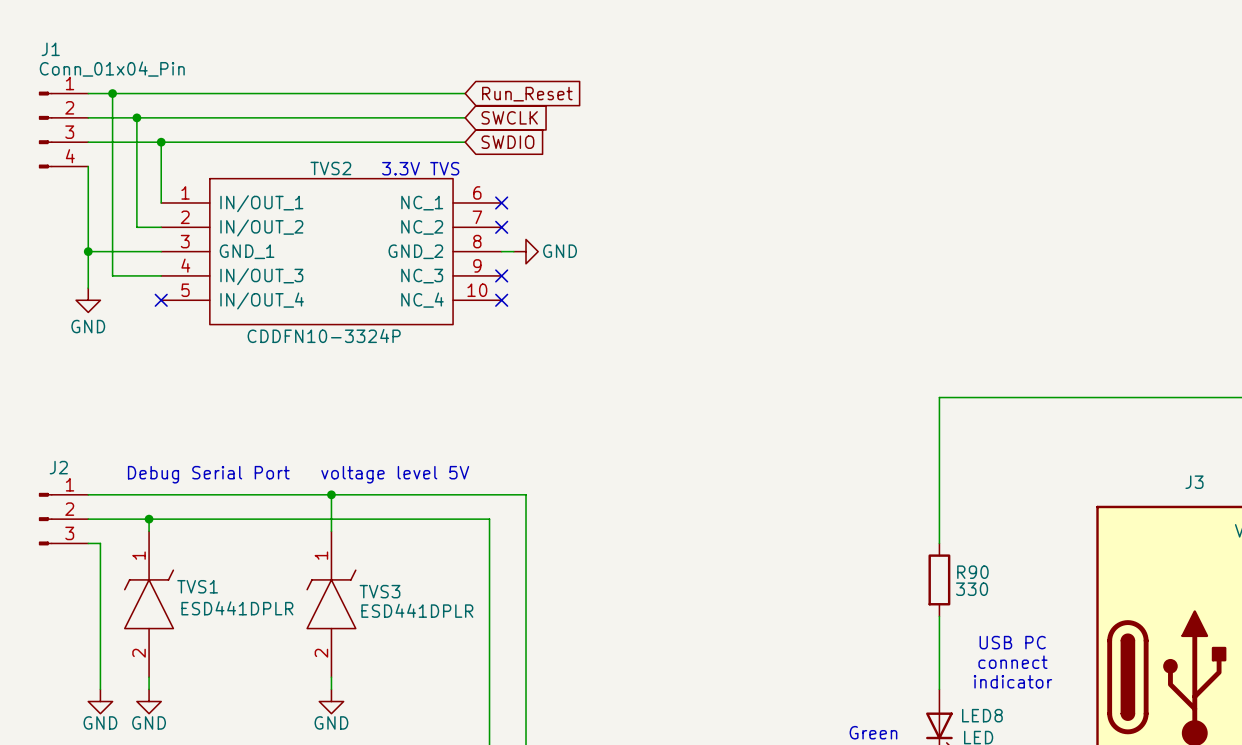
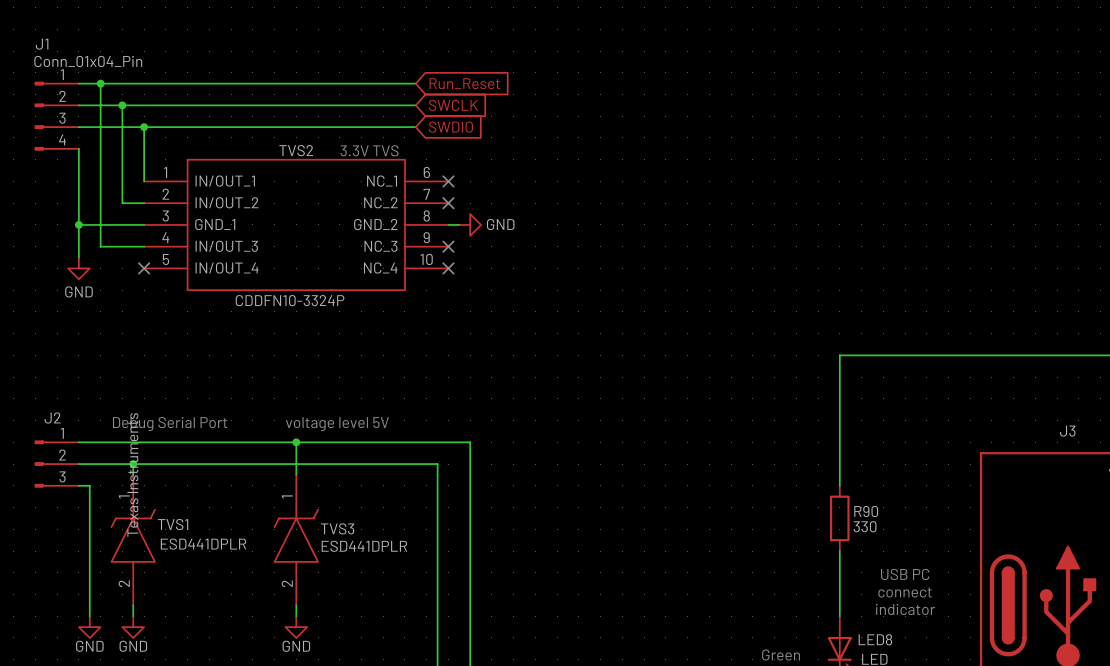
TVS1 text: none -> Texas Instruments (132, 474)

